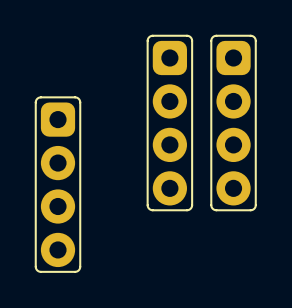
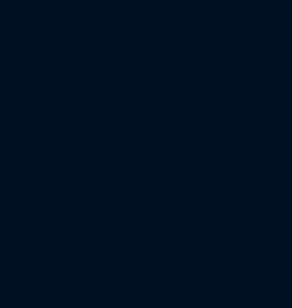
part: (169, 123) -> none
part: (233, 123) -> none
part: (58, 184) -> none

